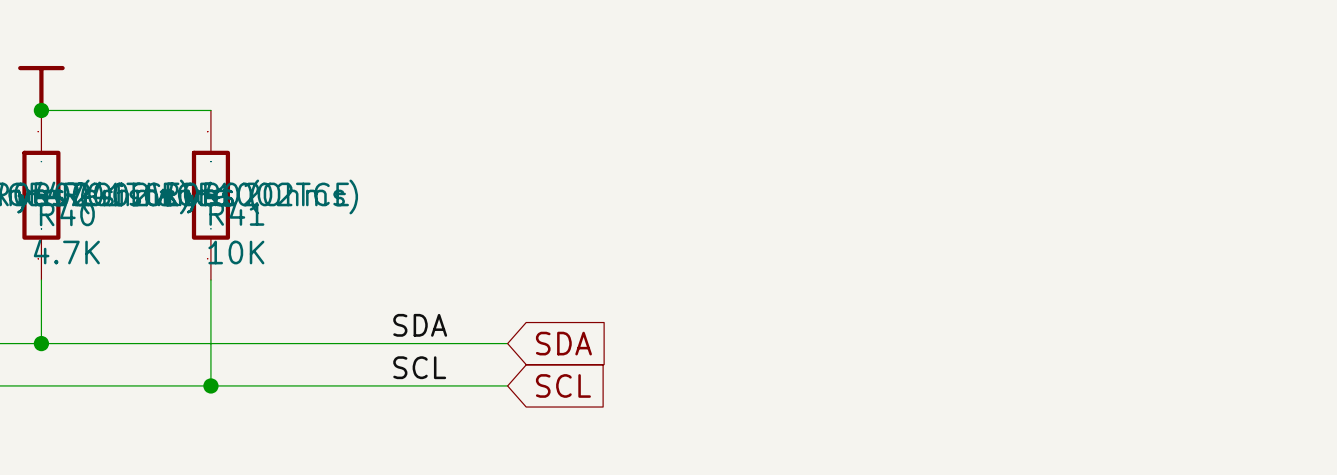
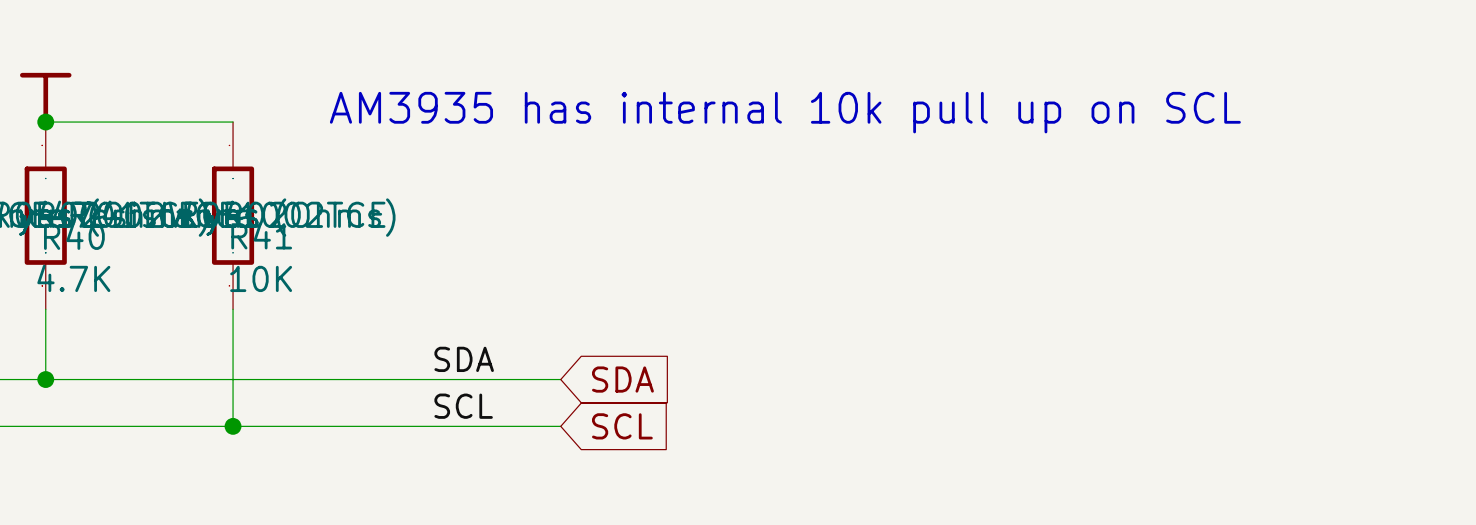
text: none -> AM3935 has internal 10k pull up on SCL (785, 112)

